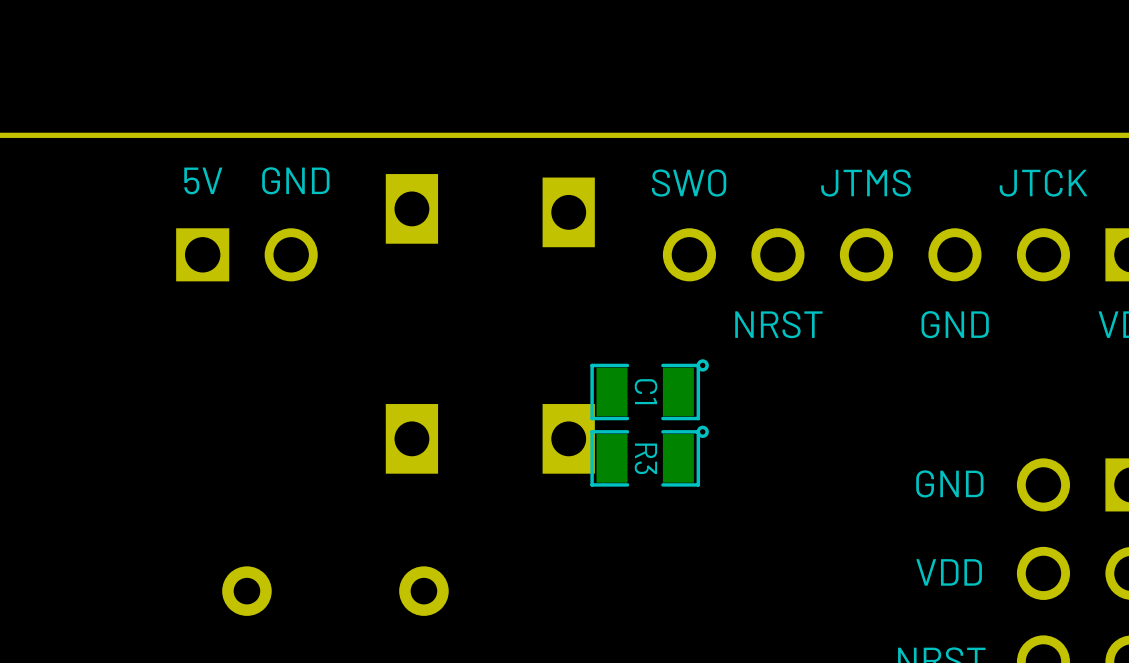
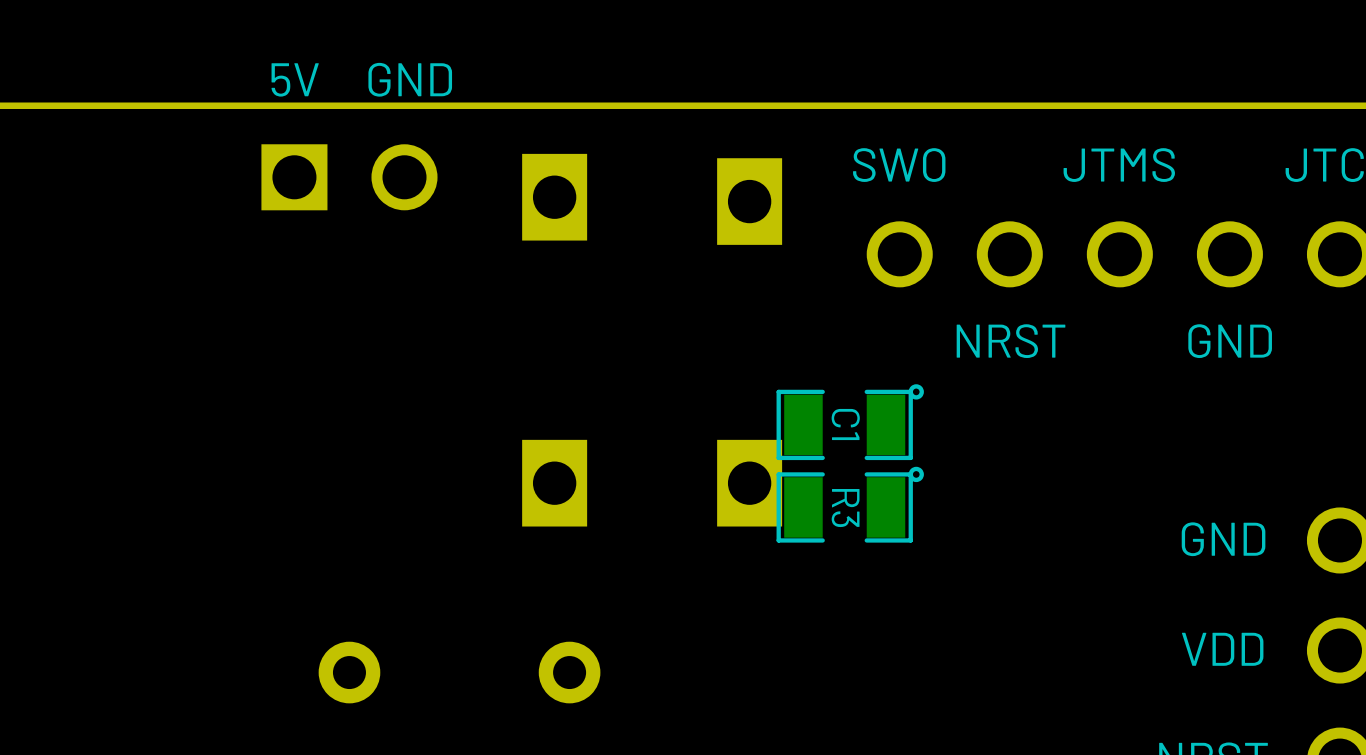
text position: 5V (203, 180) -> 5V (295, 79)
text position: GND (295, 180) -> GND (410, 79)
part position: (246, 254) -> (349, 177)

